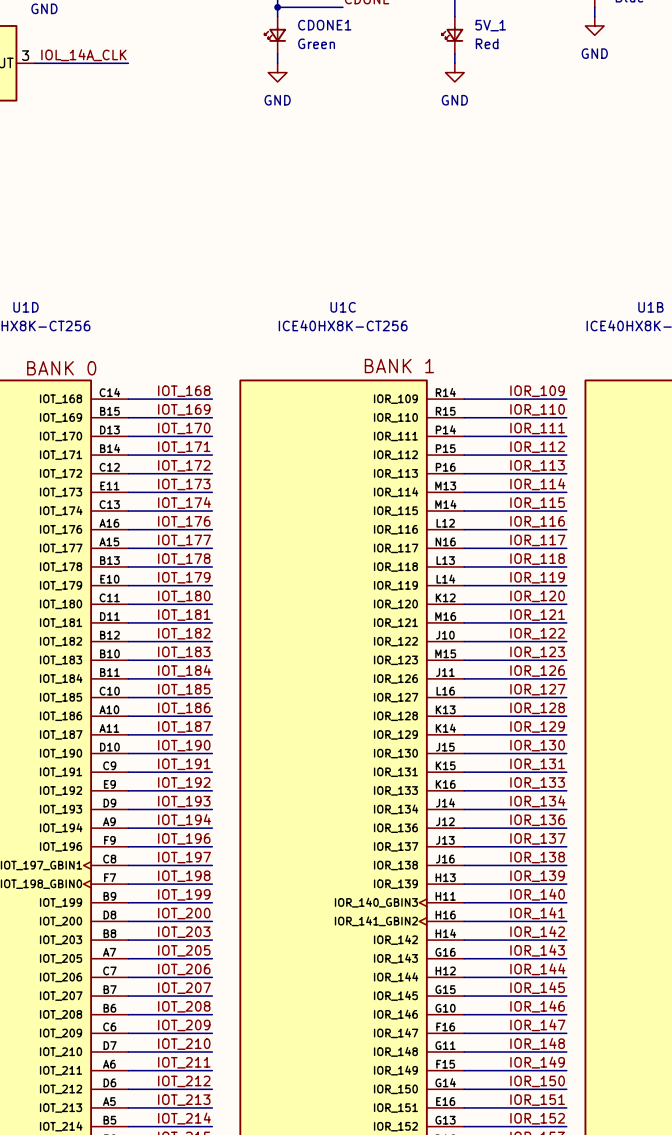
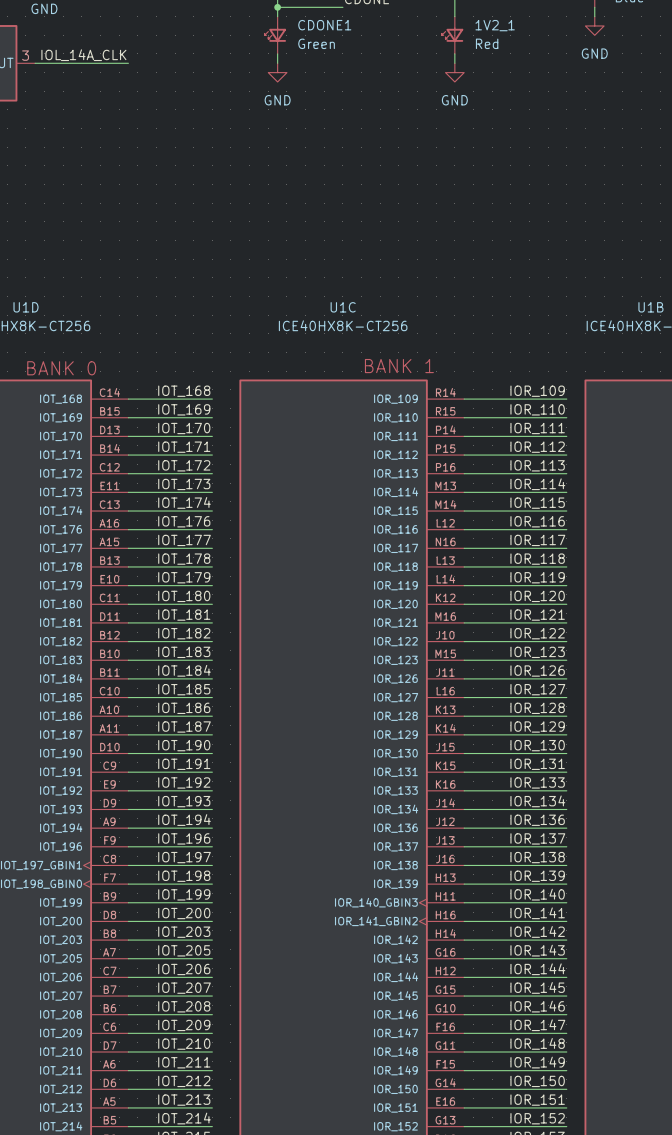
5V_1 name: 5V_1 (490, 25) -> 1V2_1 (495, 25)

